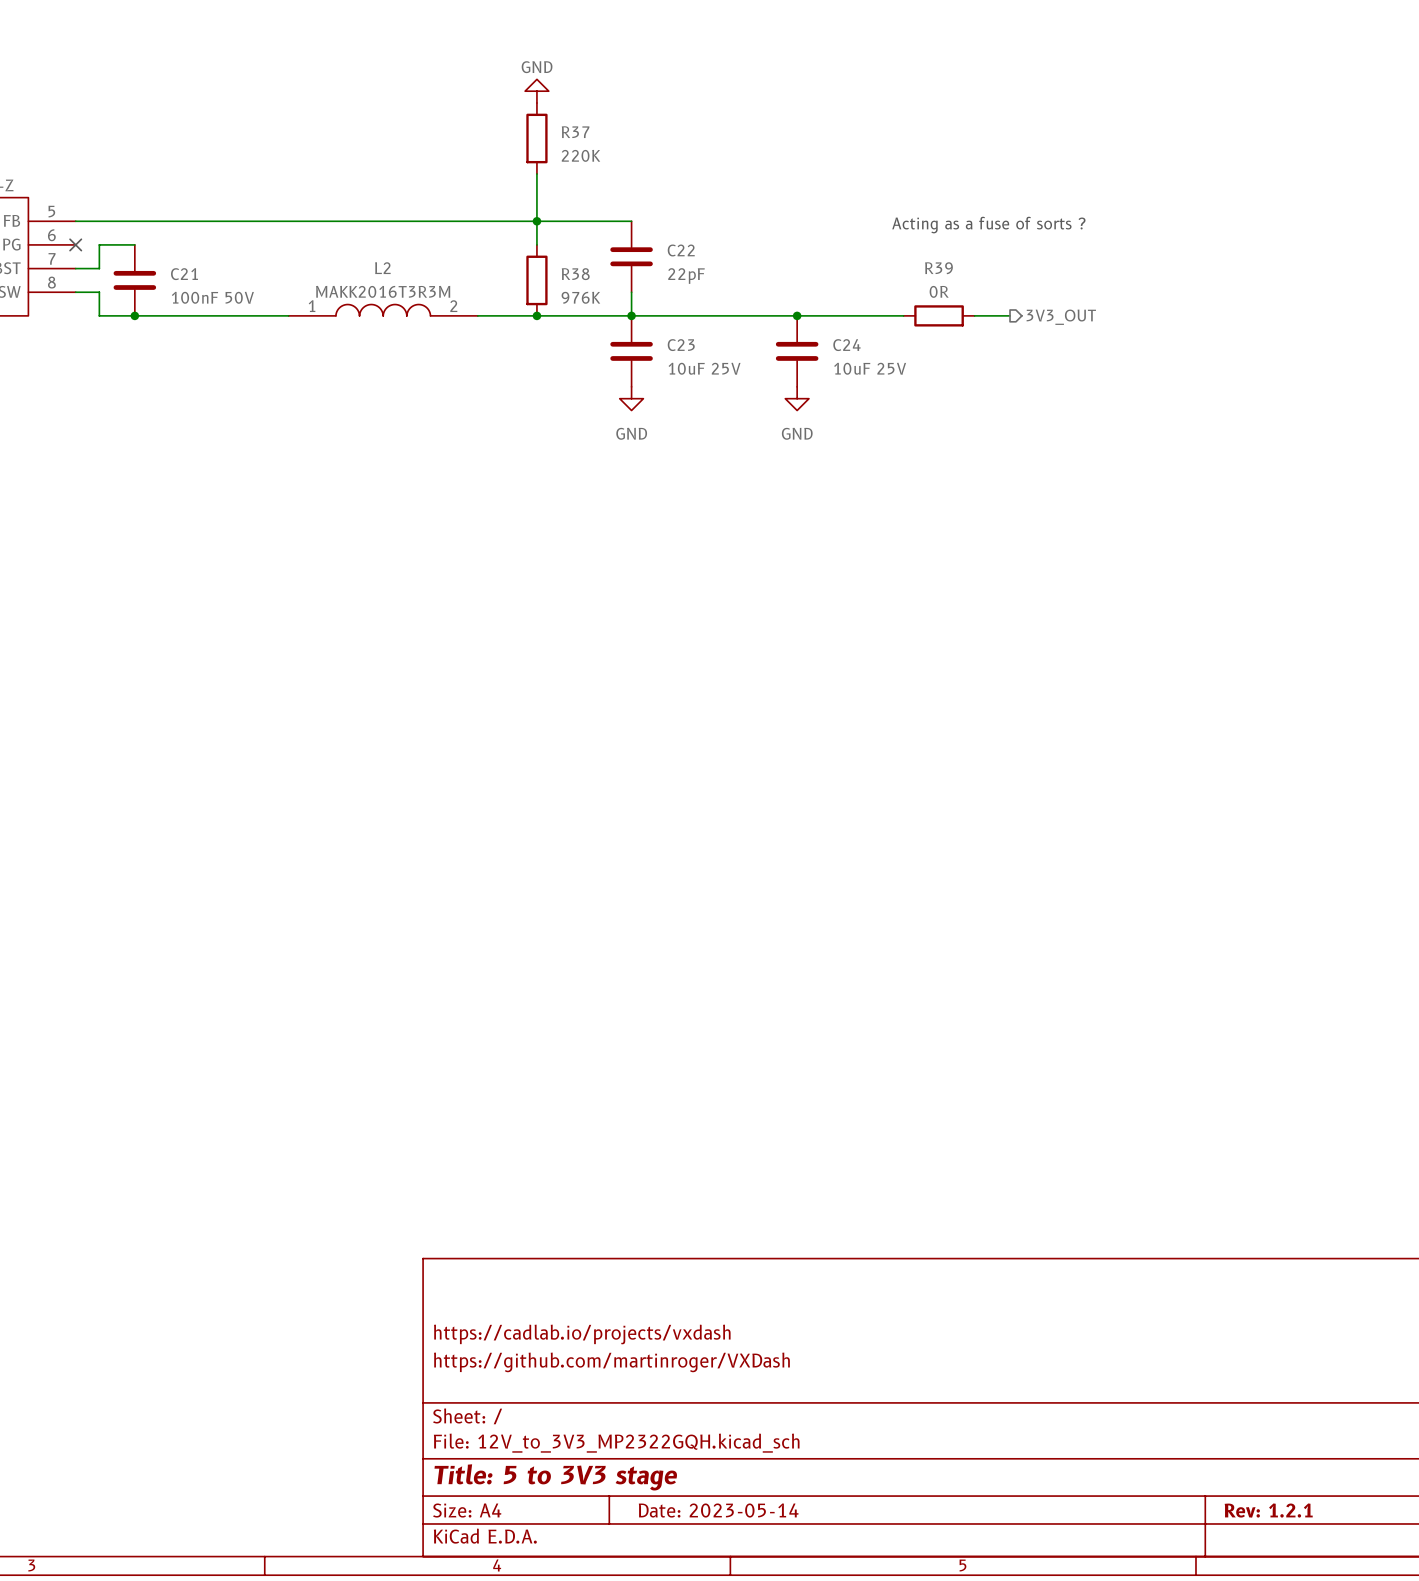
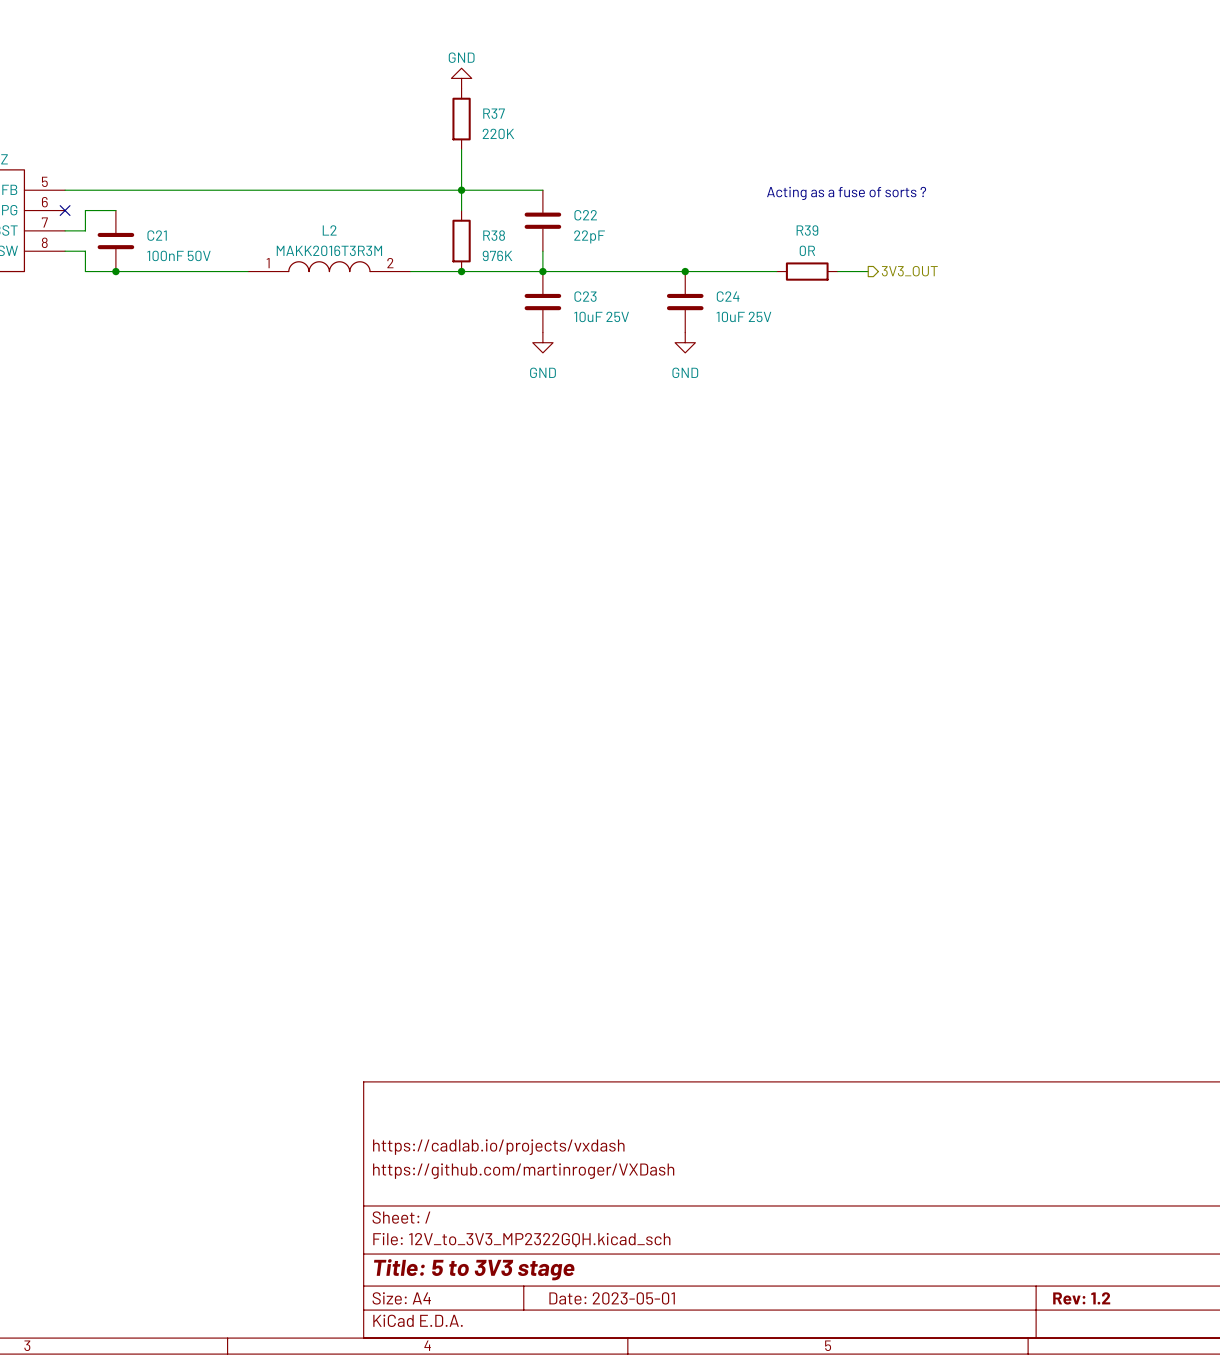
title block: Date: 2023-05-14 (718, 1510) -> Date: 2023-05-01 (612, 1298)
title block: Rev: 1.2.1 (1268, 1510) -> Rev: 1.2 (1081, 1298)

